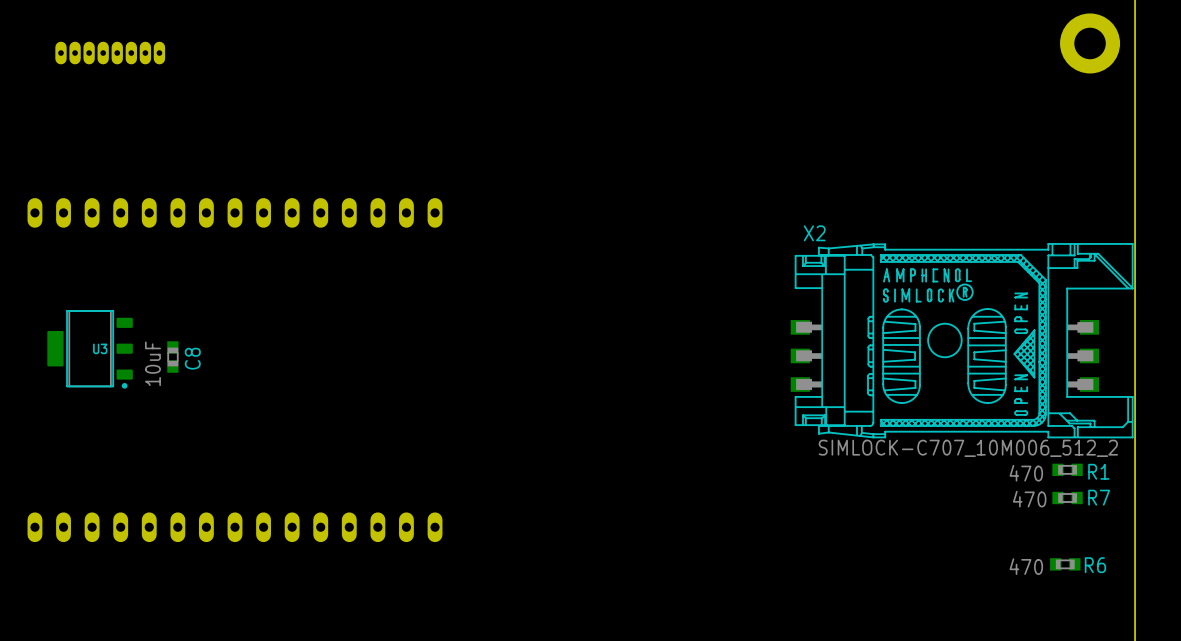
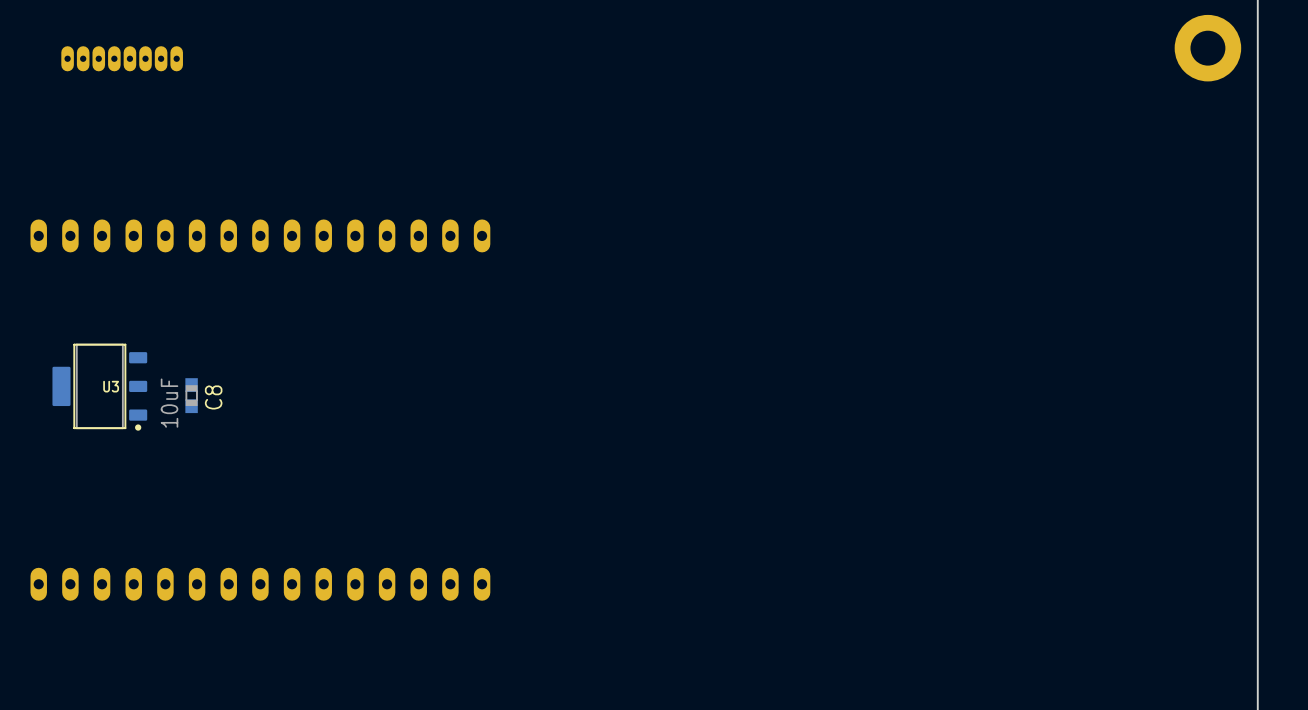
X2: SIMLOCK-C707_10M006_512_2 (962, 340) -> none
R1: 470 (1067, 469) -> none
R7: 470 (1067, 497) -> none
R6: 470 (1065, 564) -> none

